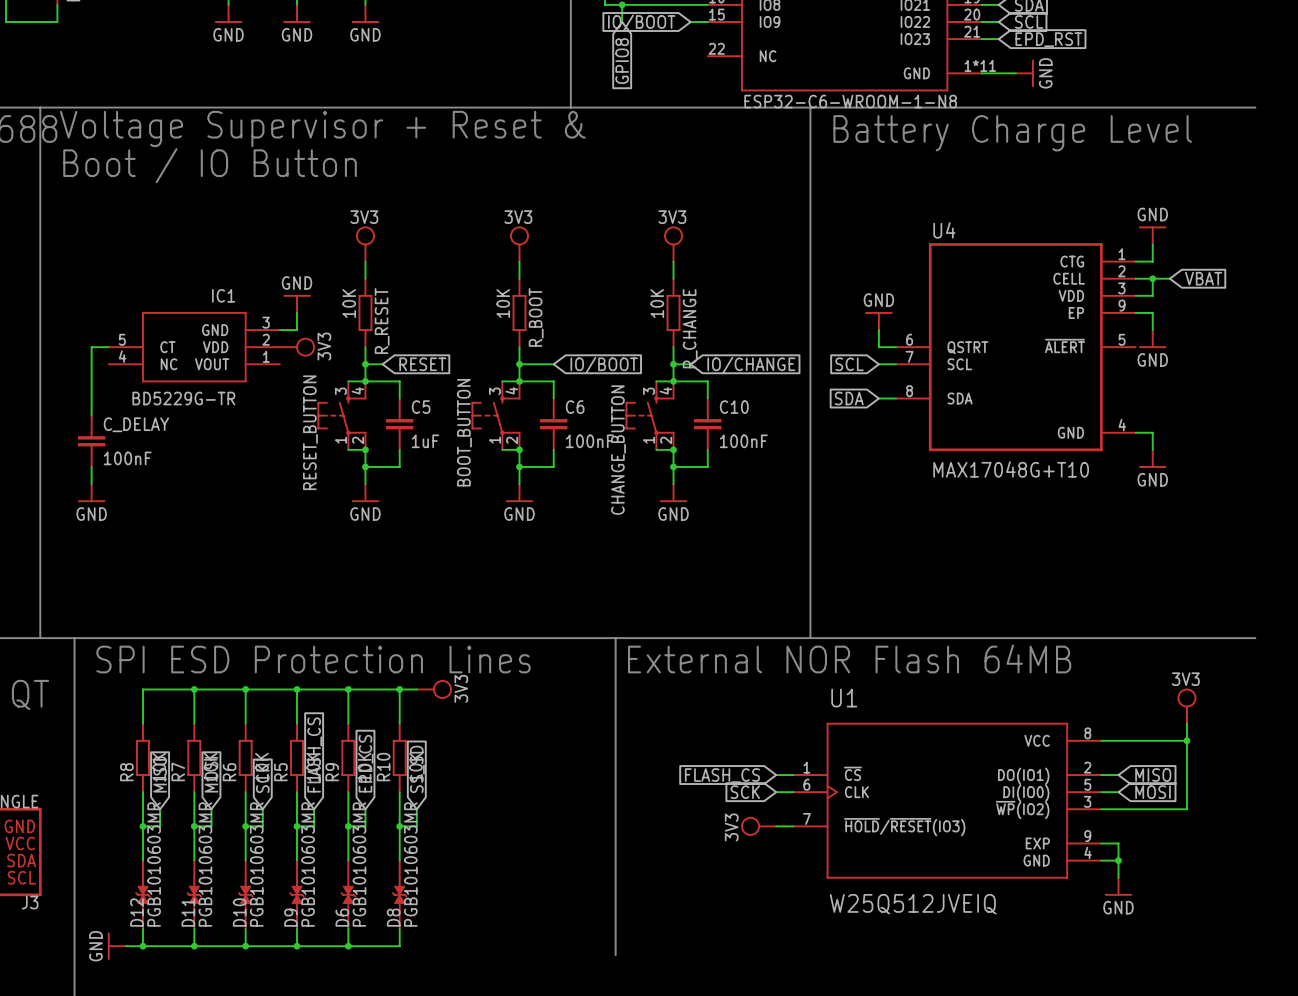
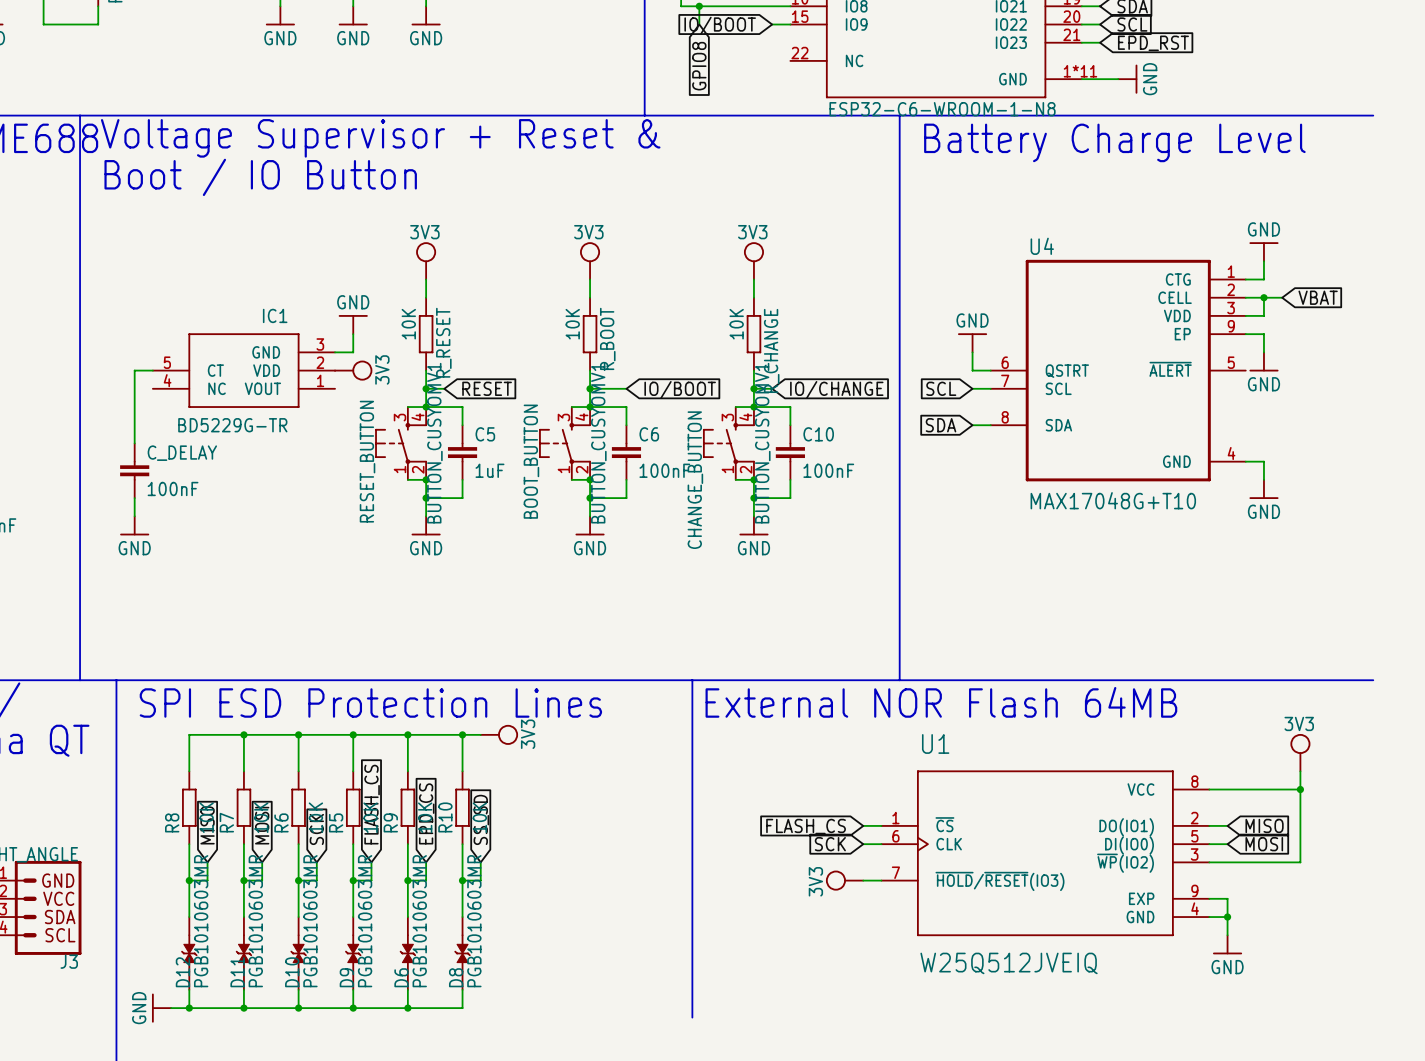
RESET_BUTTON value: none -> BUTTON_CUSYOMV1 (434, 443)
BOOT_BUTTON value: none -> BUTTON_CUSYOMV1 (598, 443)
CHANGE_BUTTON value: none -> BUTTON_CUSYOMV1 (762, 443)

